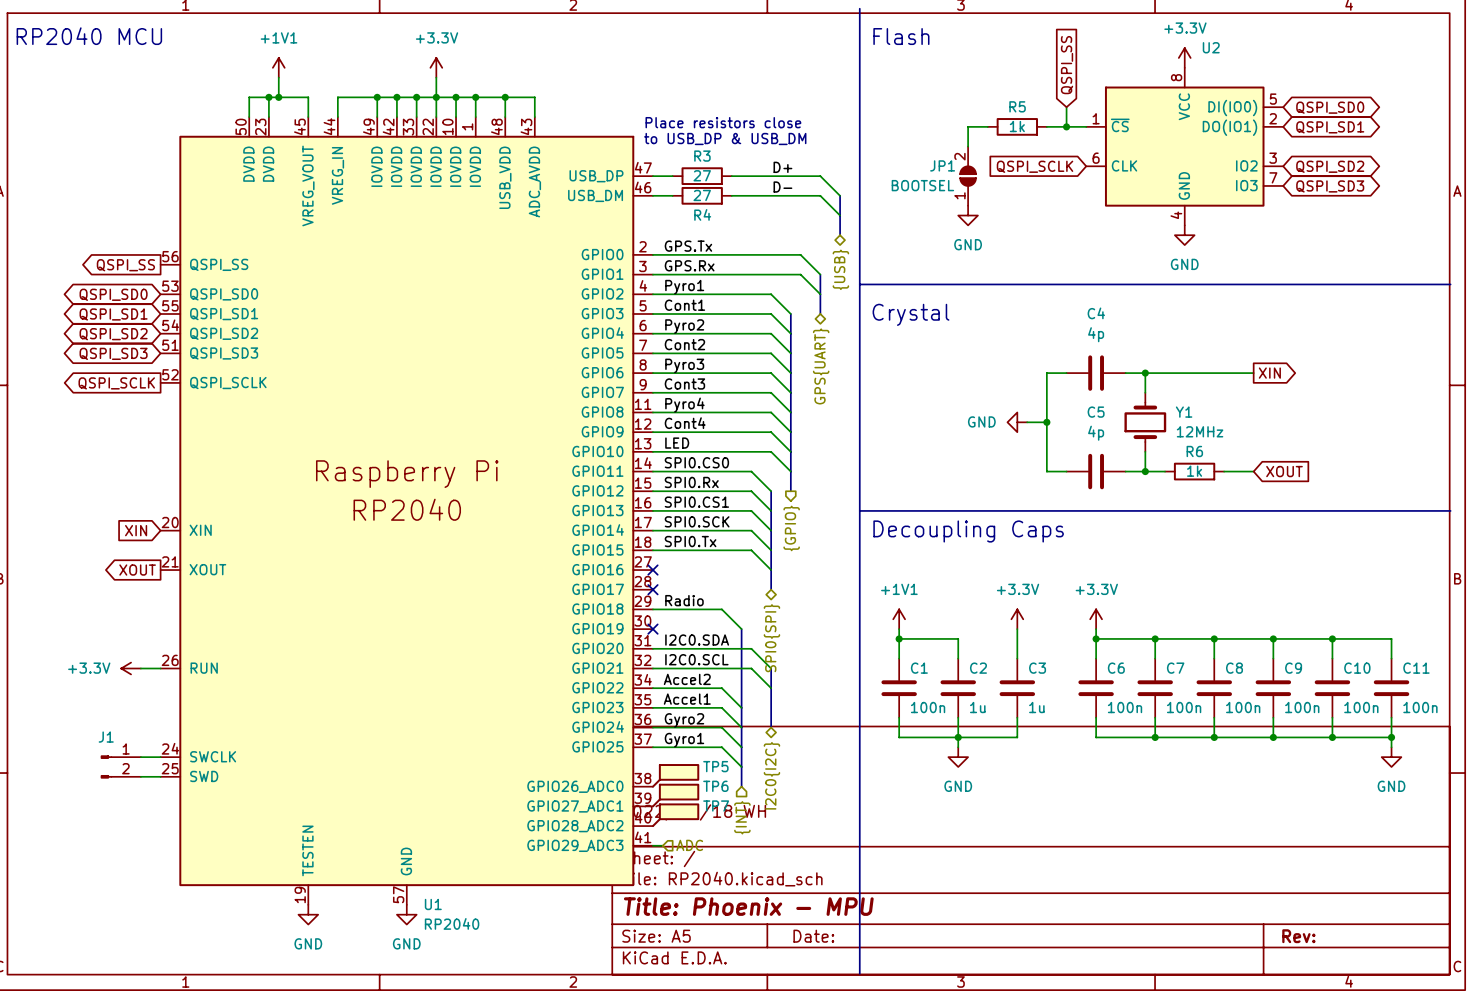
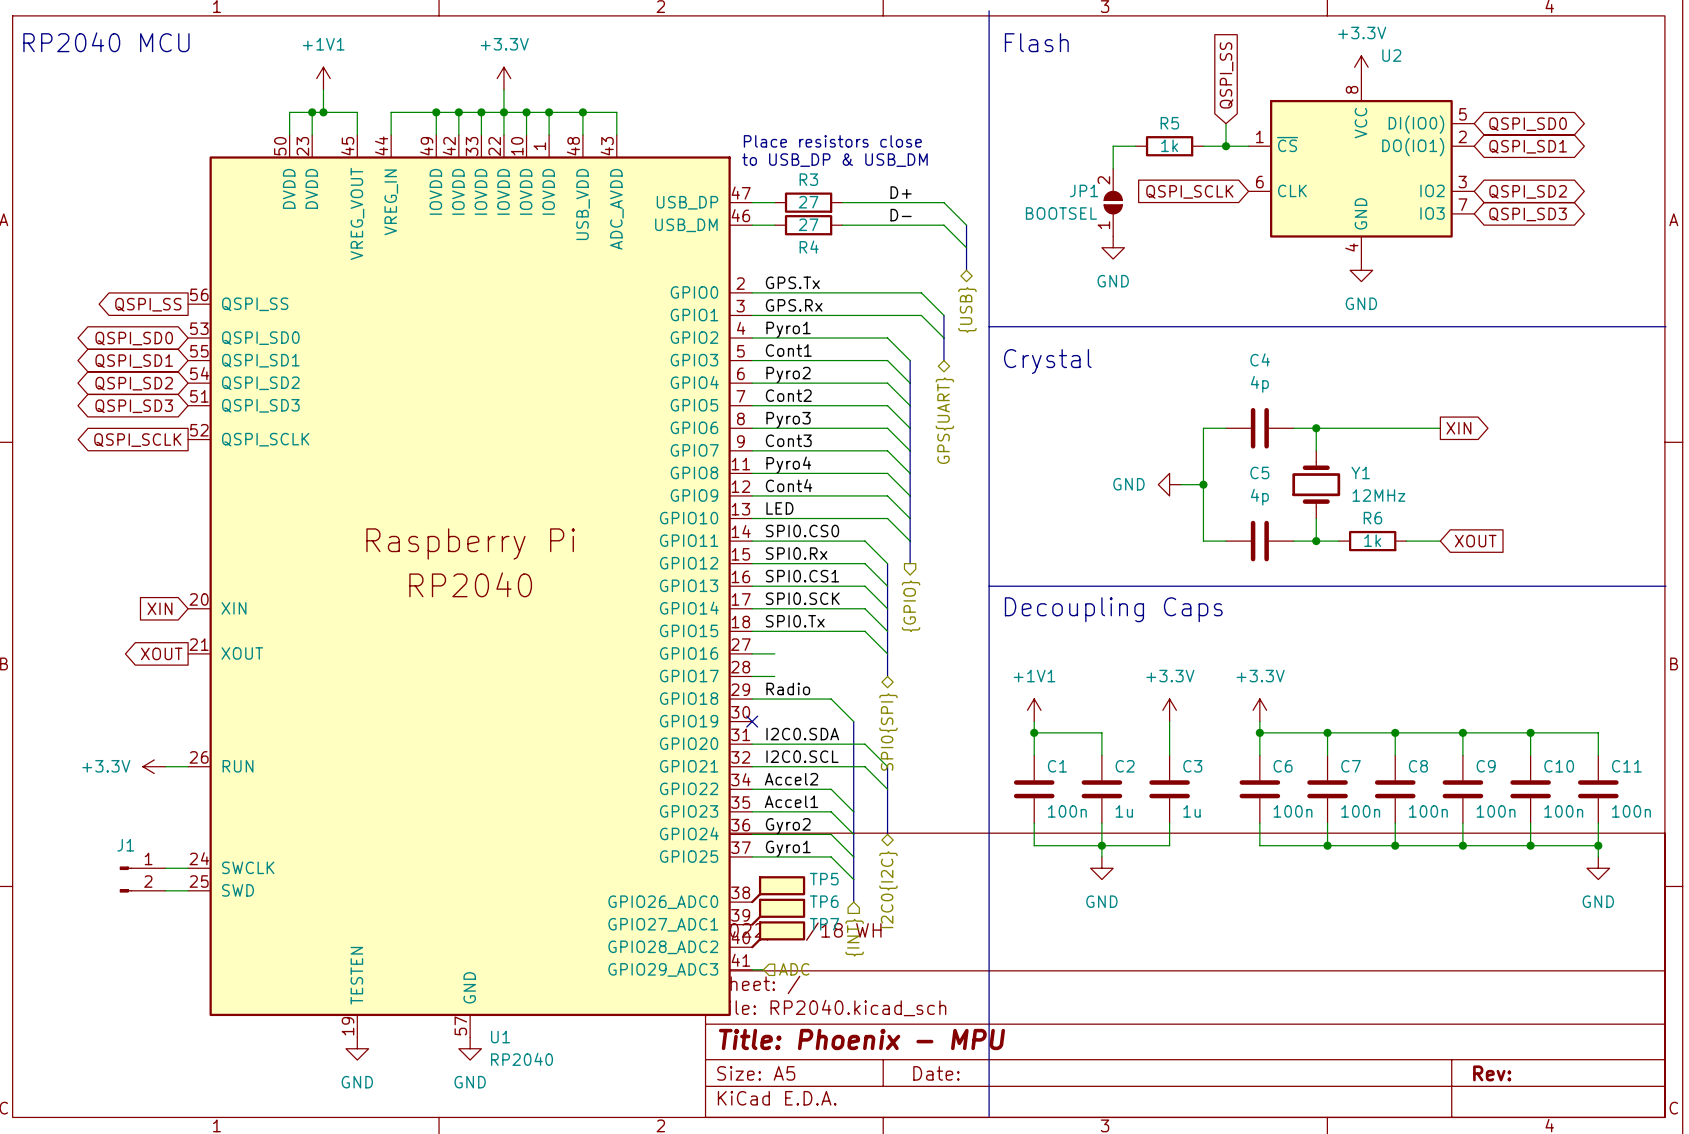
wire: none -> (752, 653) (774, 653)
no-connect mark: (652, 570) -> none
wire: none -> (752, 676) (774, 676)
no-connect mark: (652, 589) -> none

